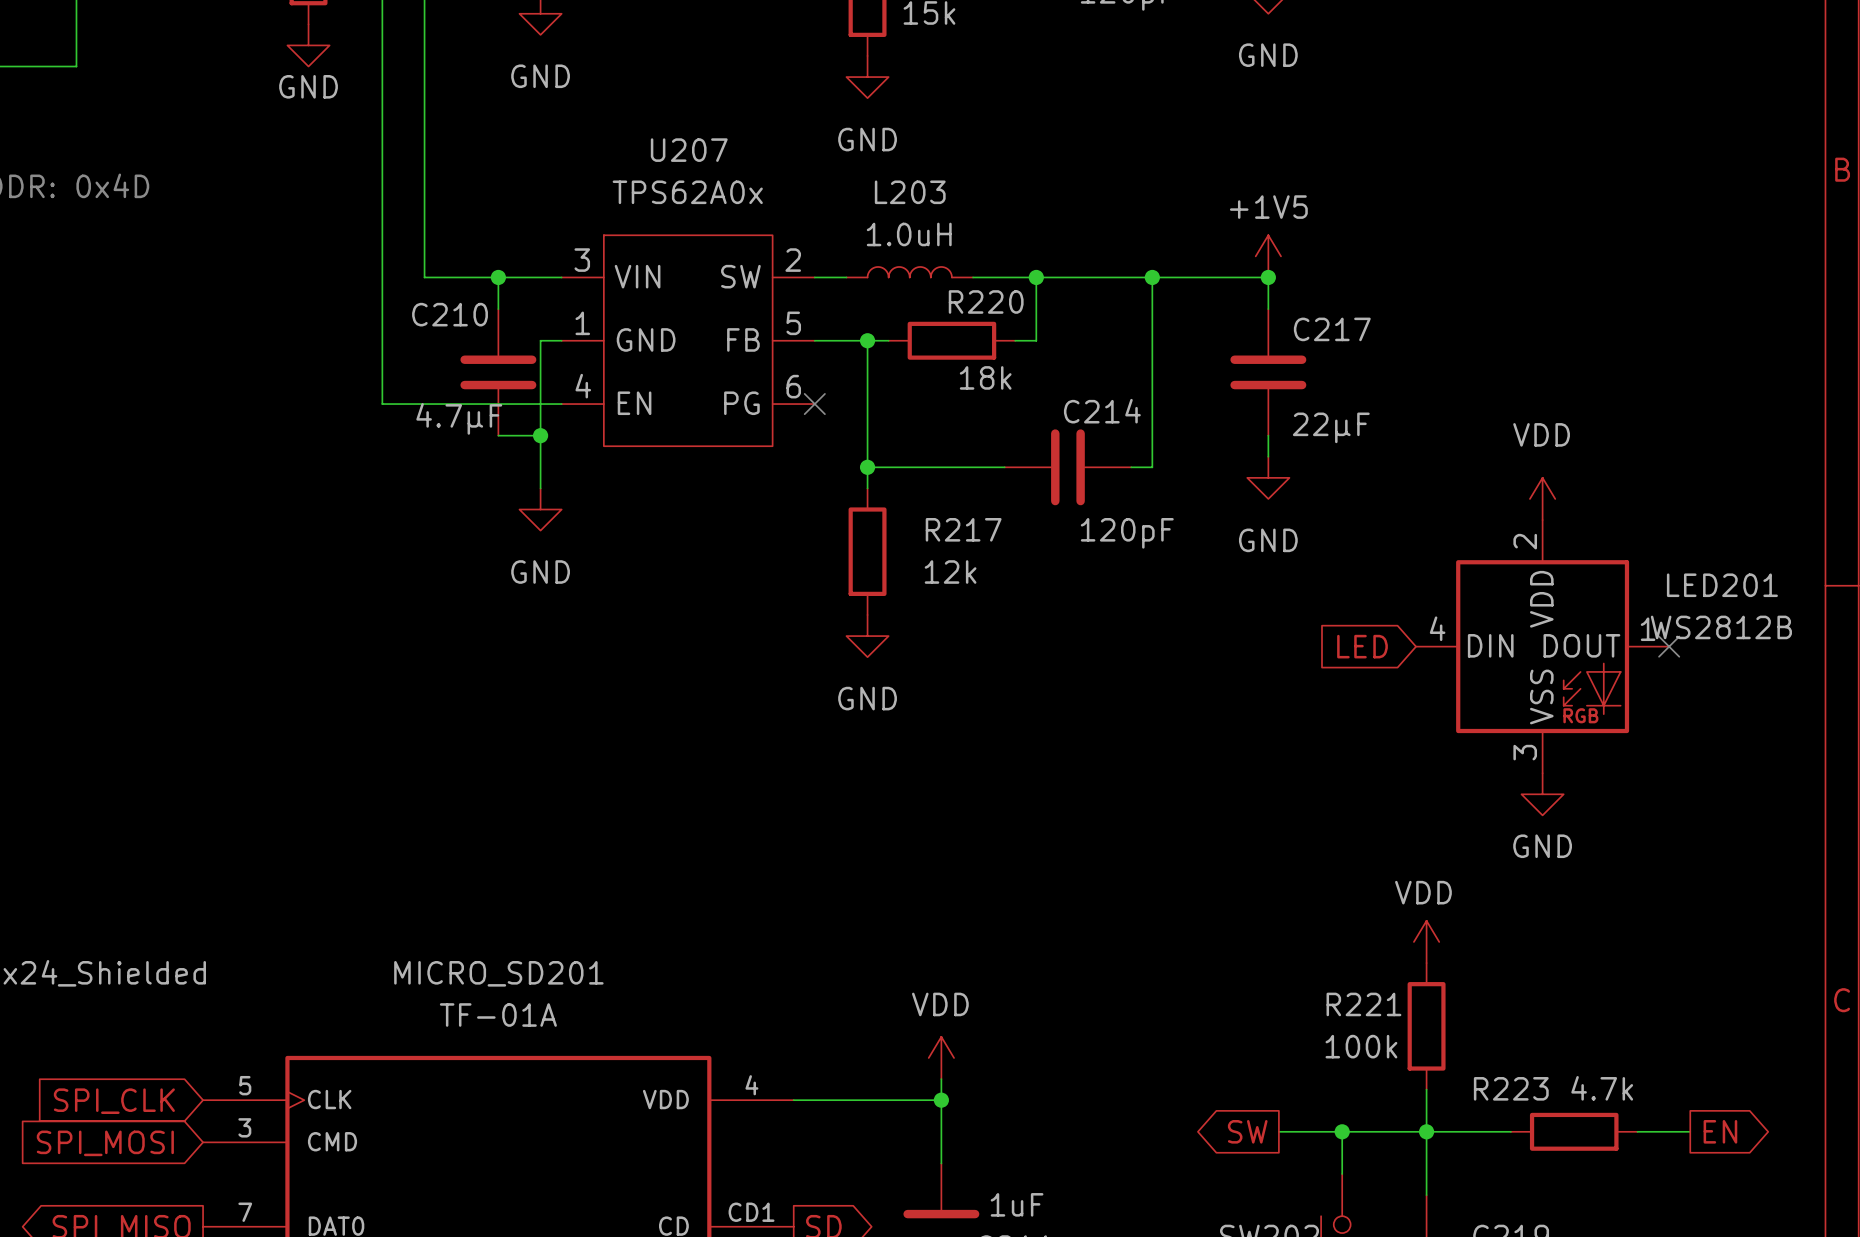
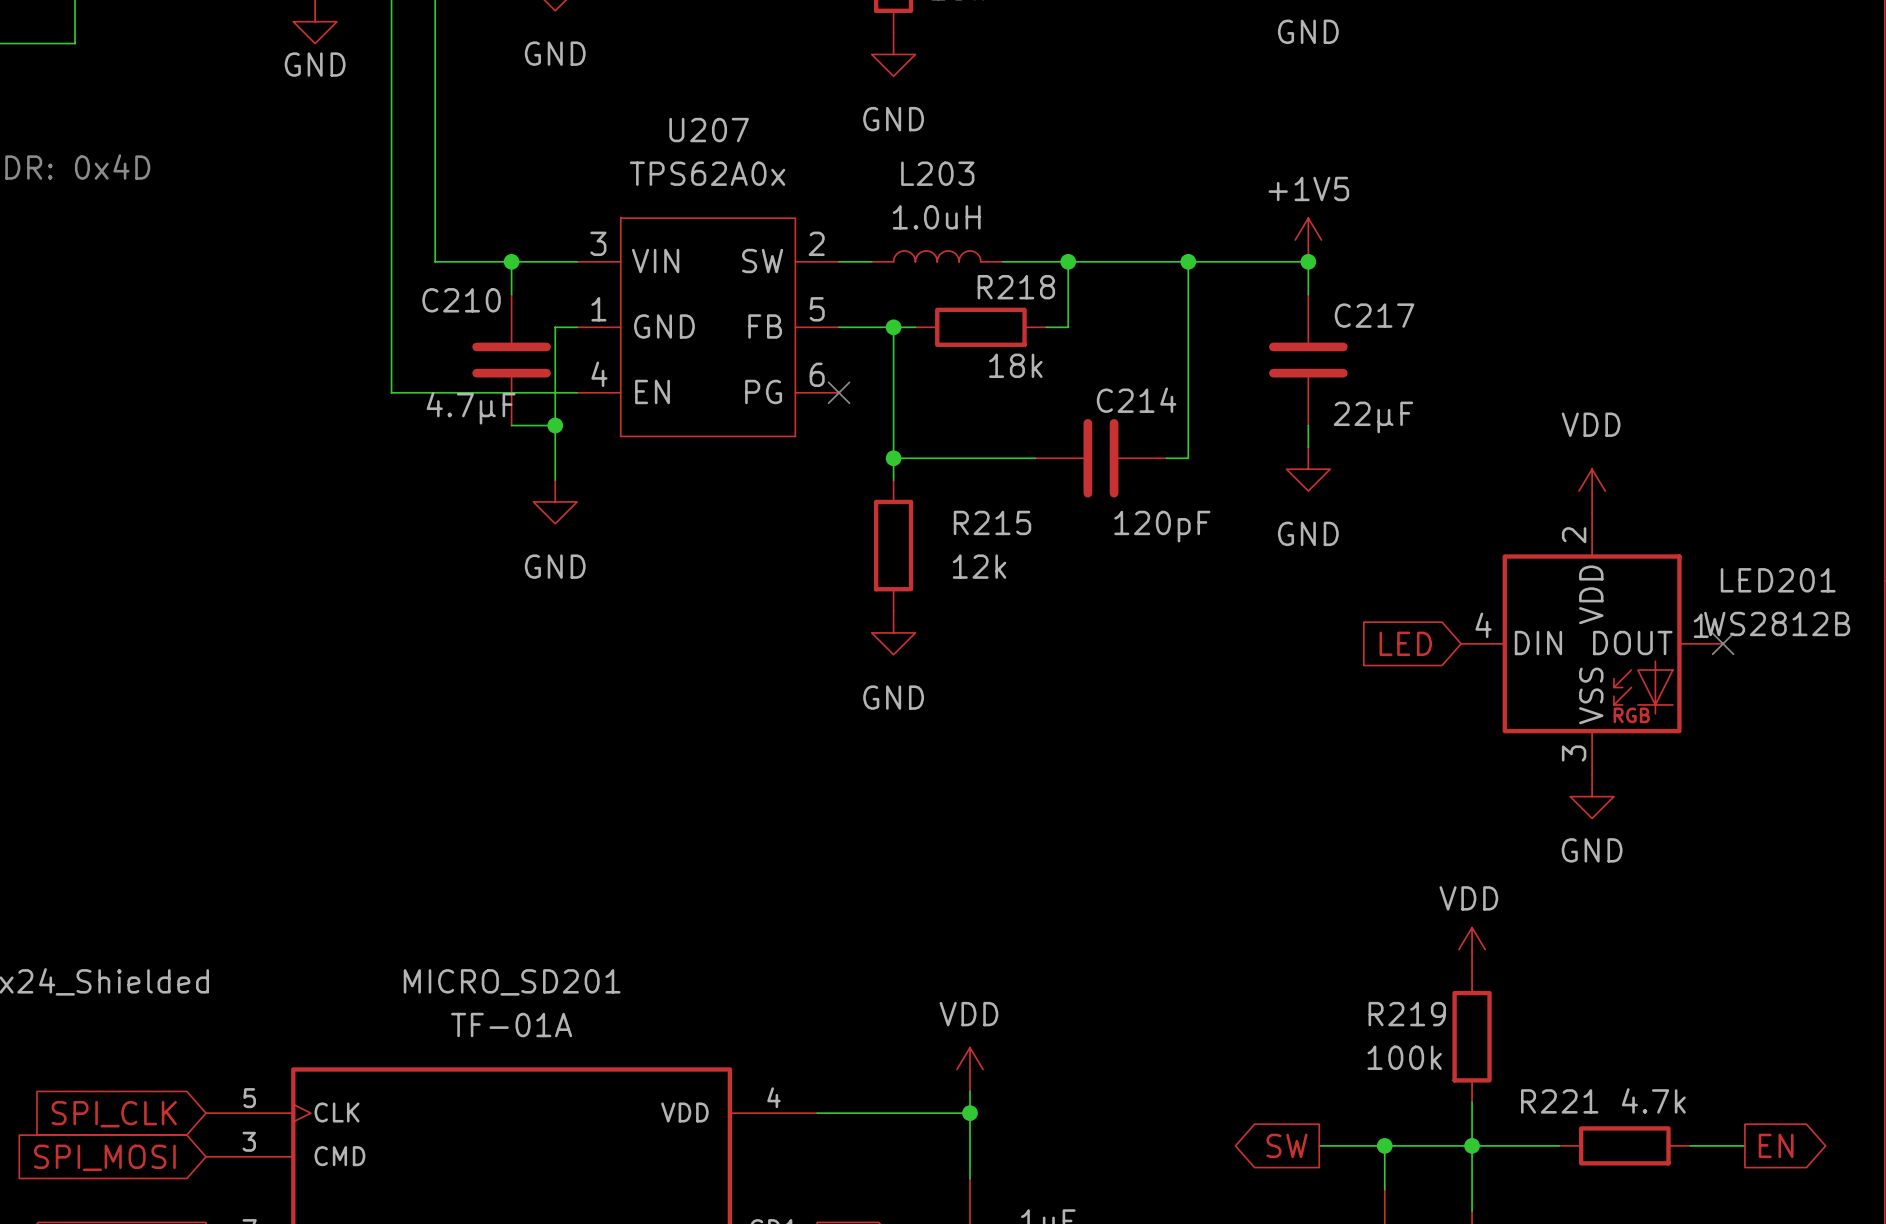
R220 name: R220 (986, 301) -> R218 (1016, 287)
R217 name: R217 (963, 529) -> R215 (992, 522)
R221 name: R221 (1363, 1004) -> R219 (1407, 1014)
R223 name: R223 (1511, 1088) -> R221 (1559, 1101)

